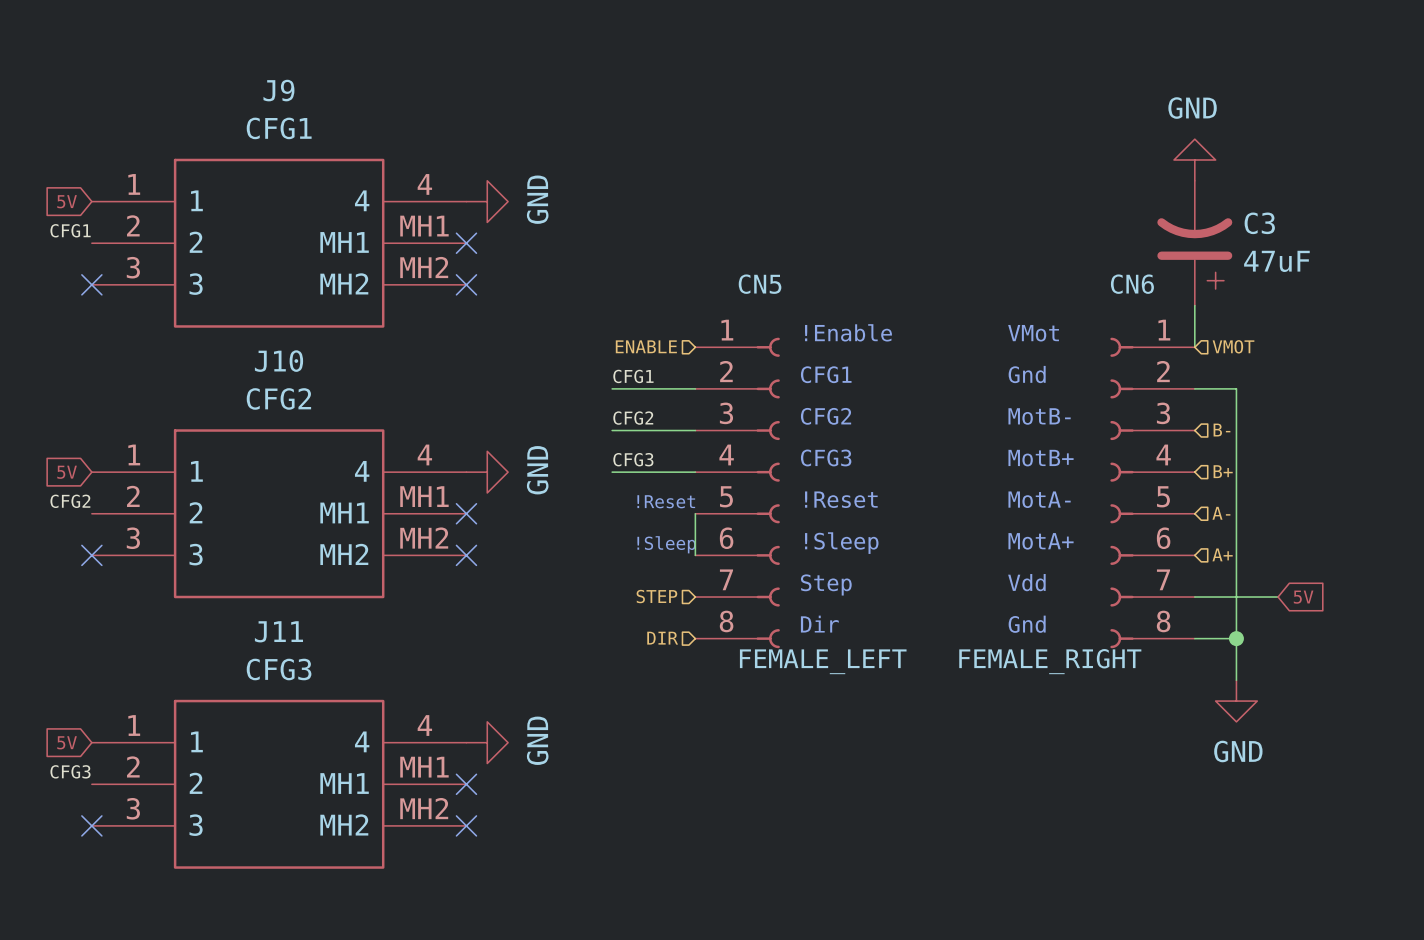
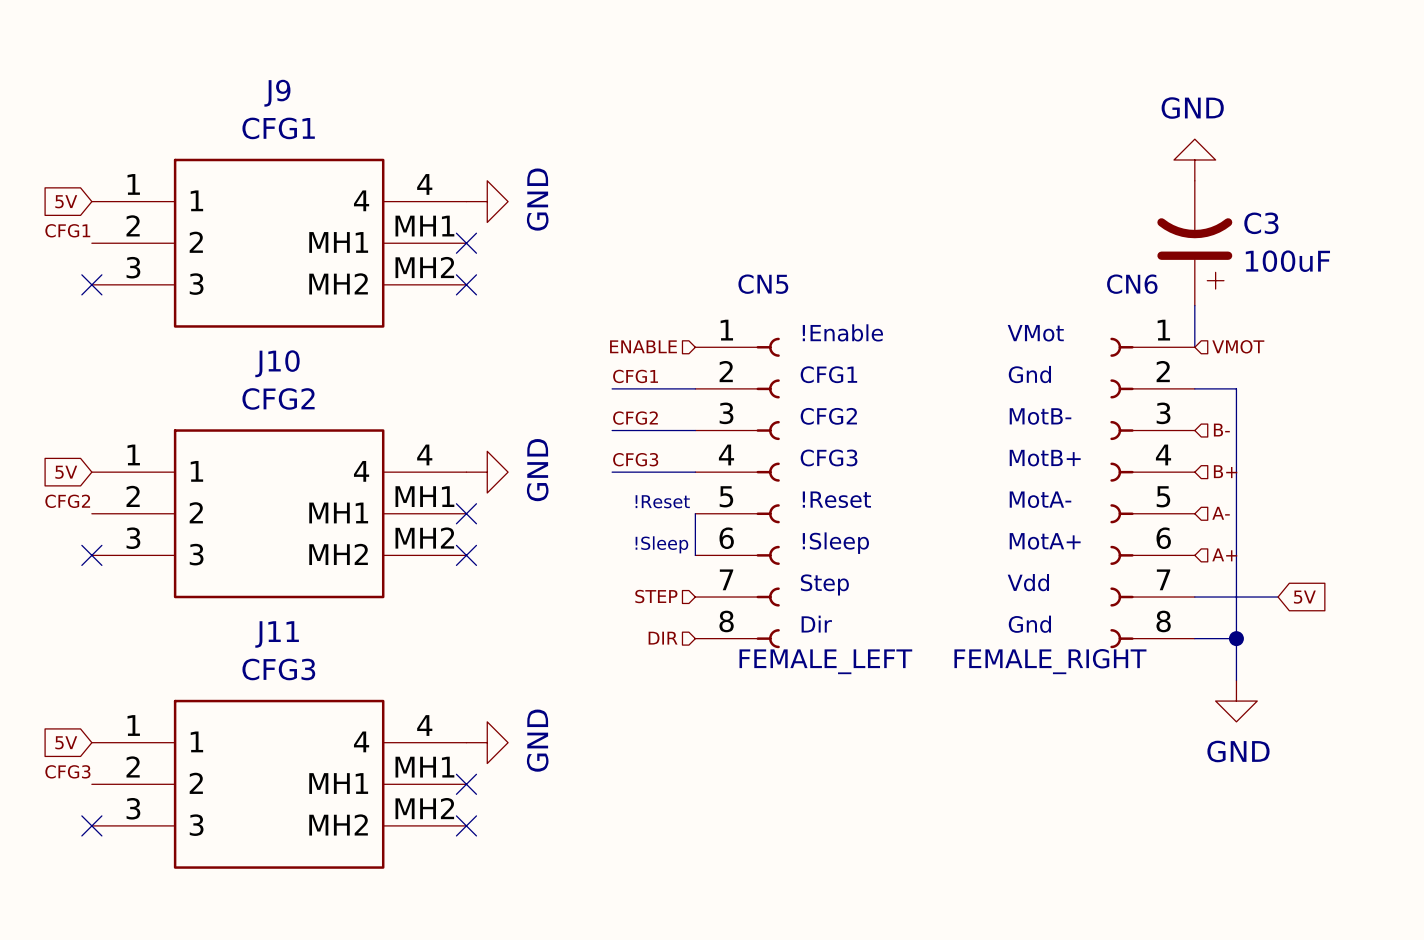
C3 value: 47uF (1276, 261) -> 100uF (1287, 261)

